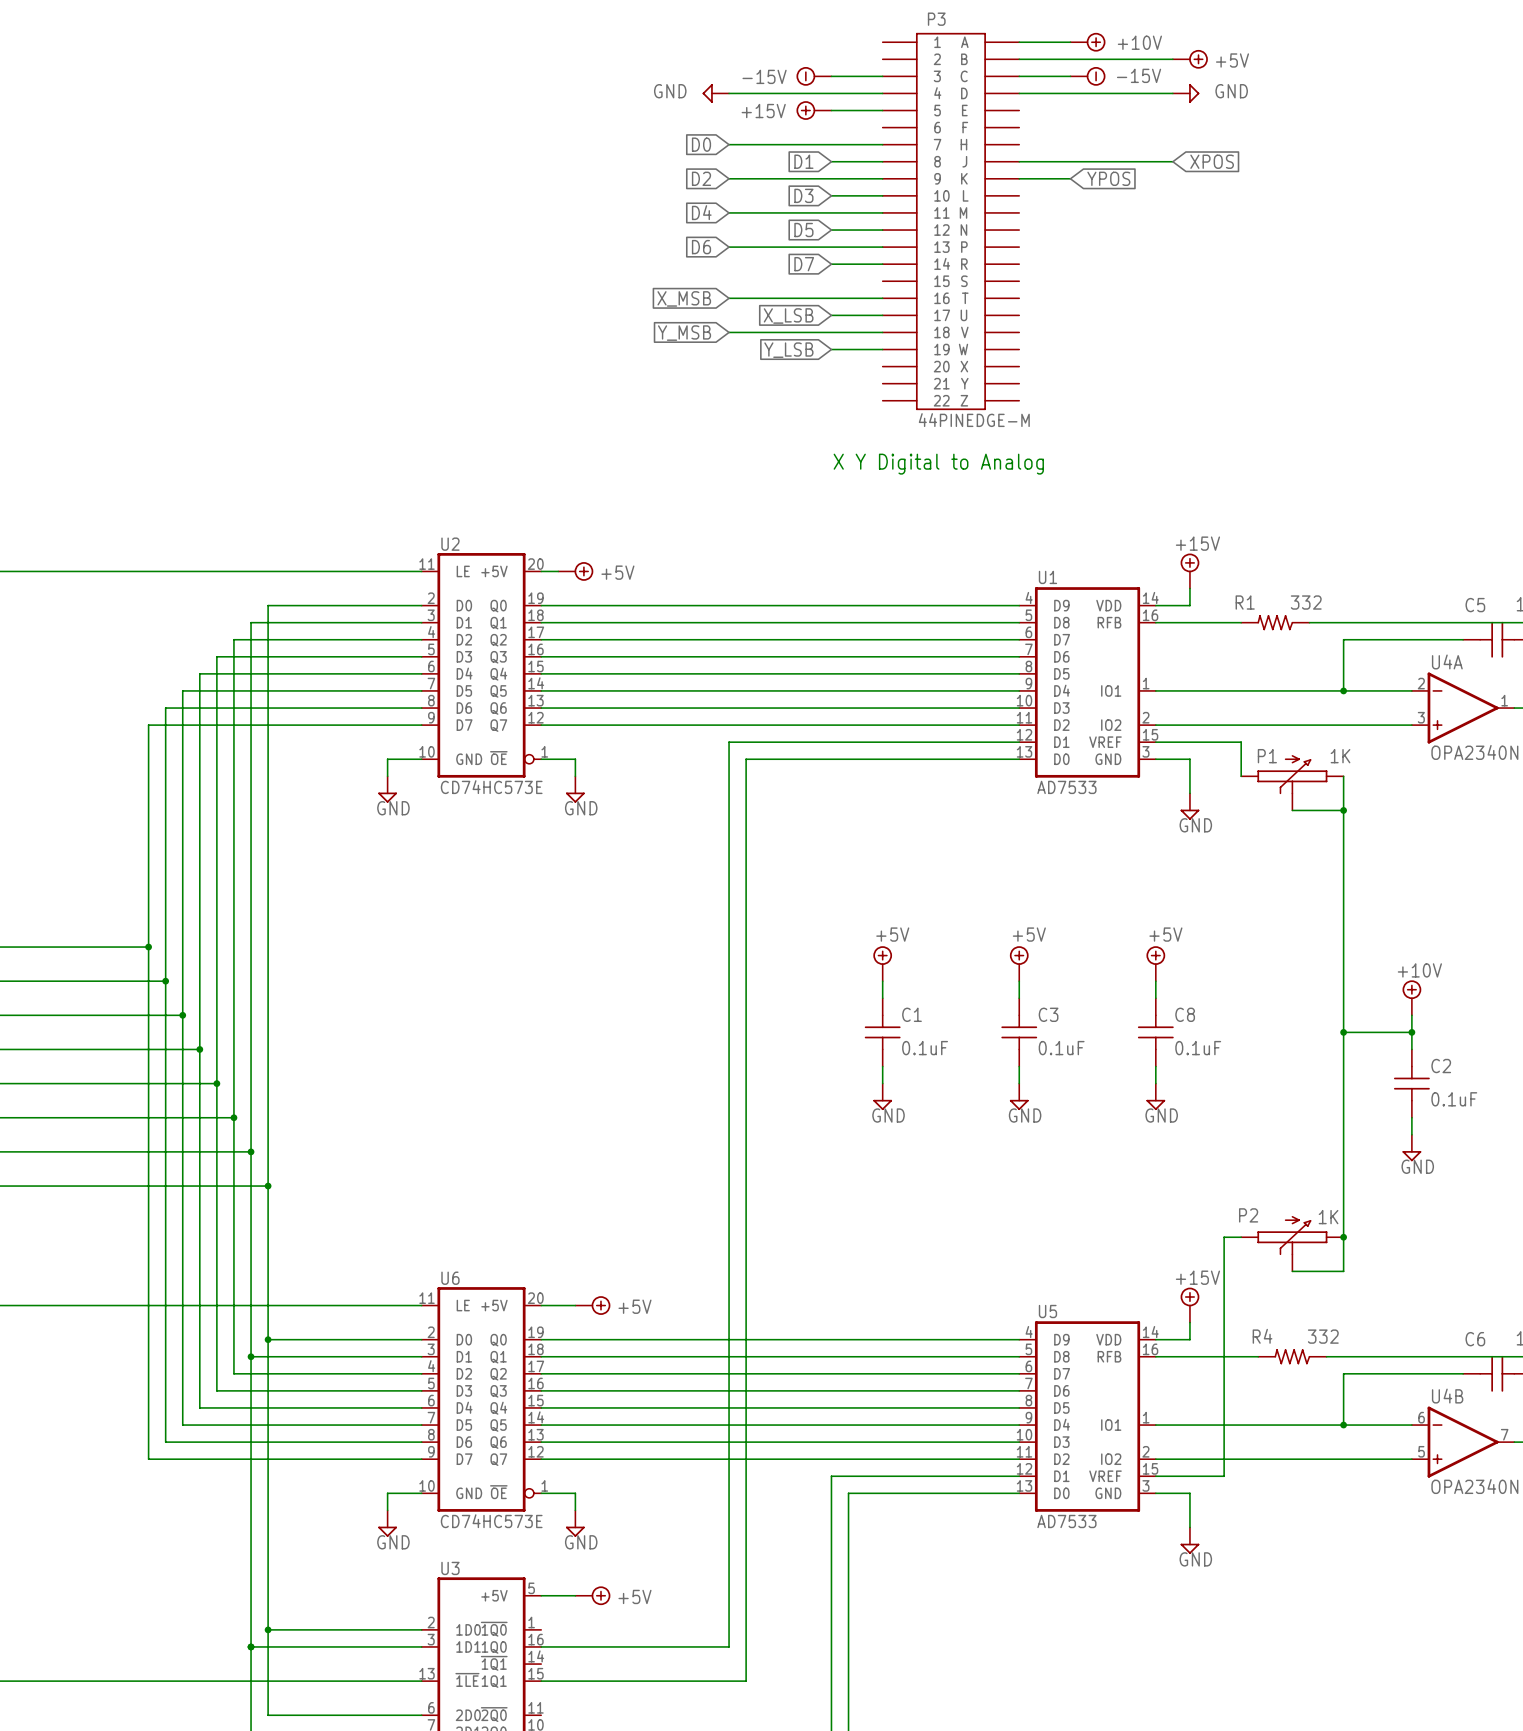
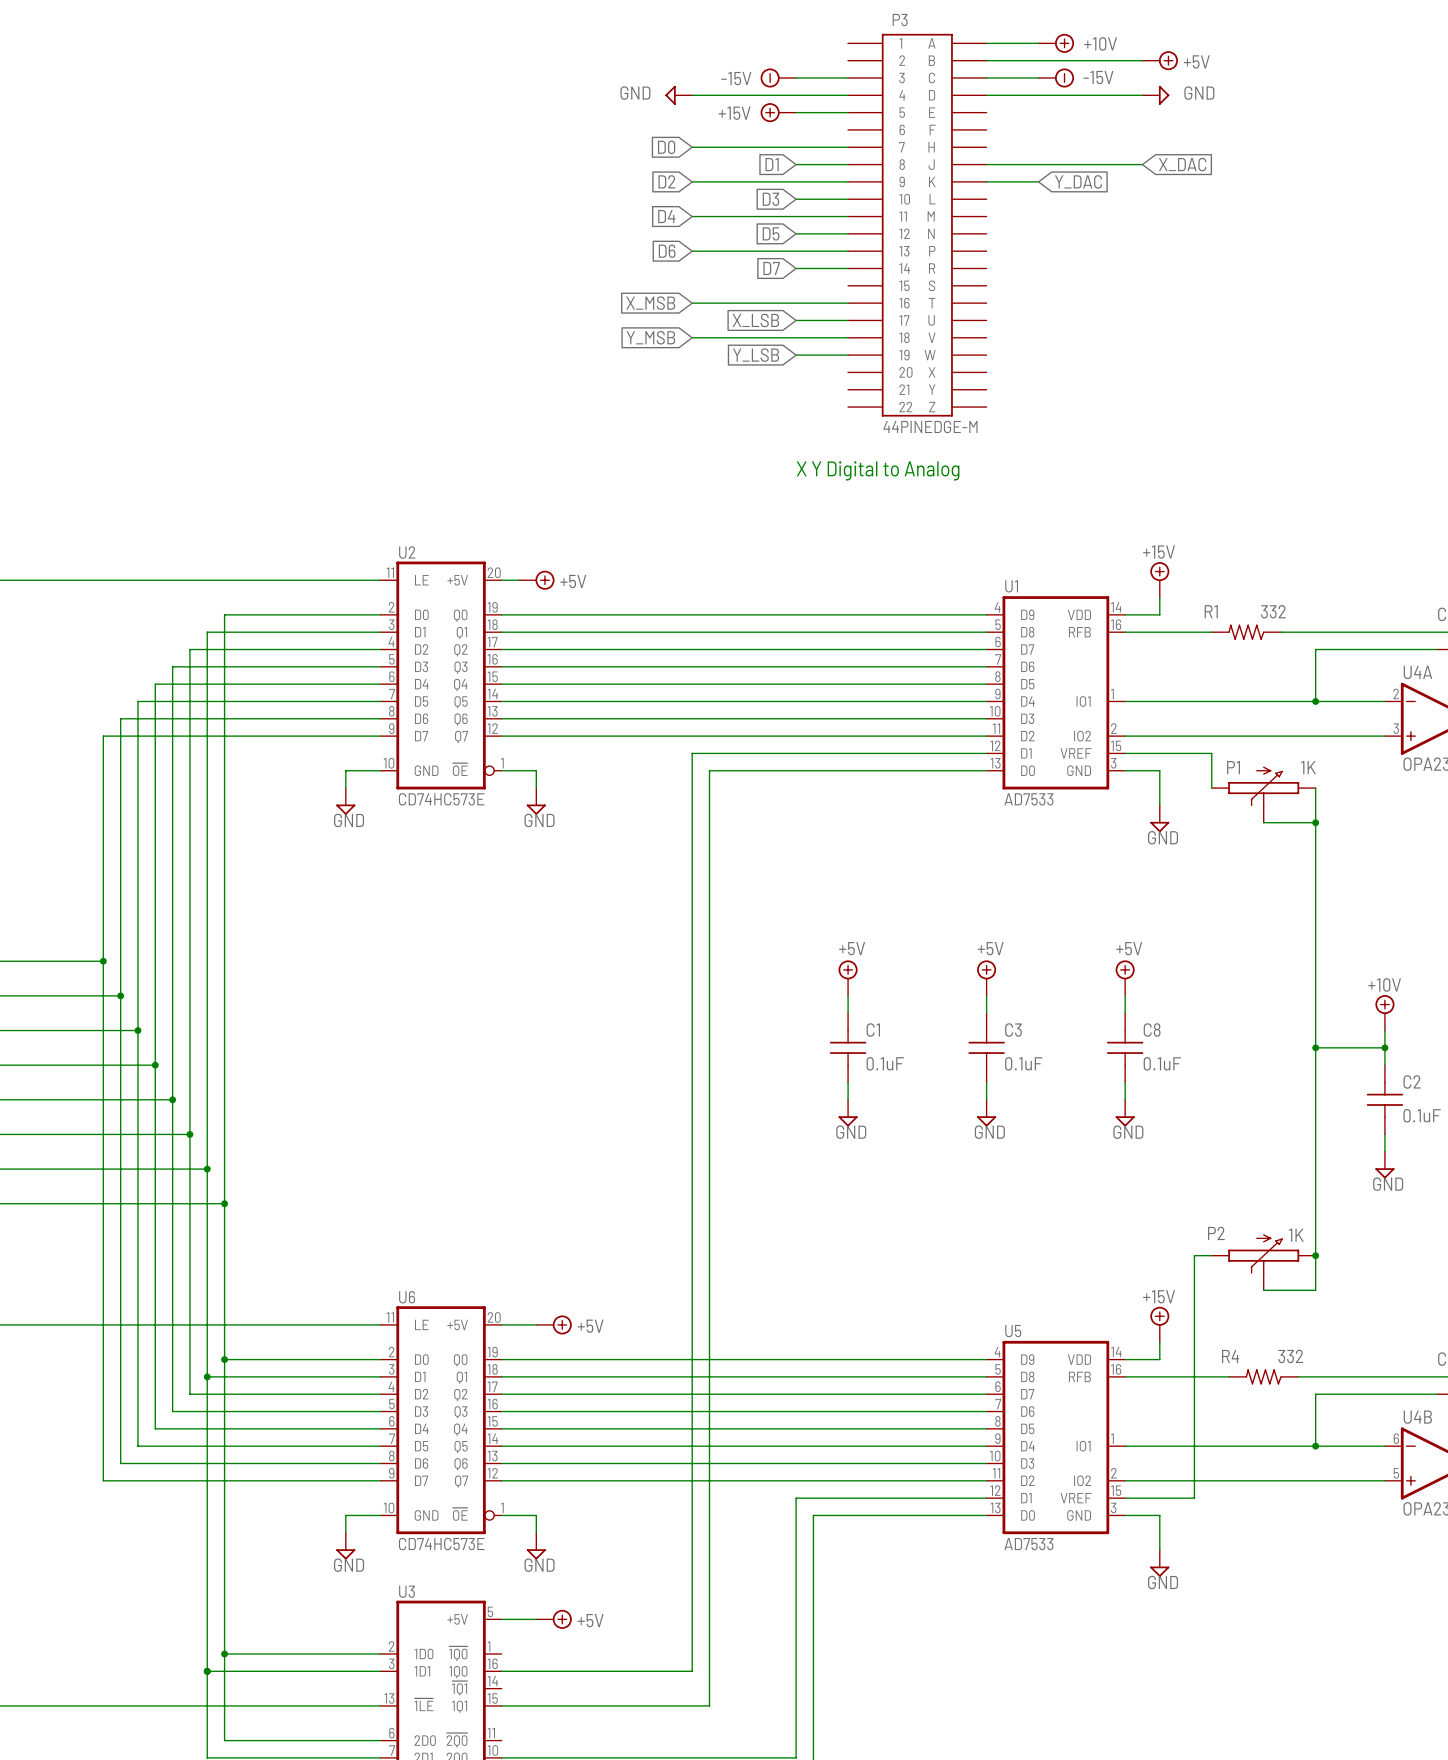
global label: XPOS (1212, 161) -> X_DAC (1182, 164)
global label: YPOS (1108, 178) -> Y_DAC (1078, 181)

